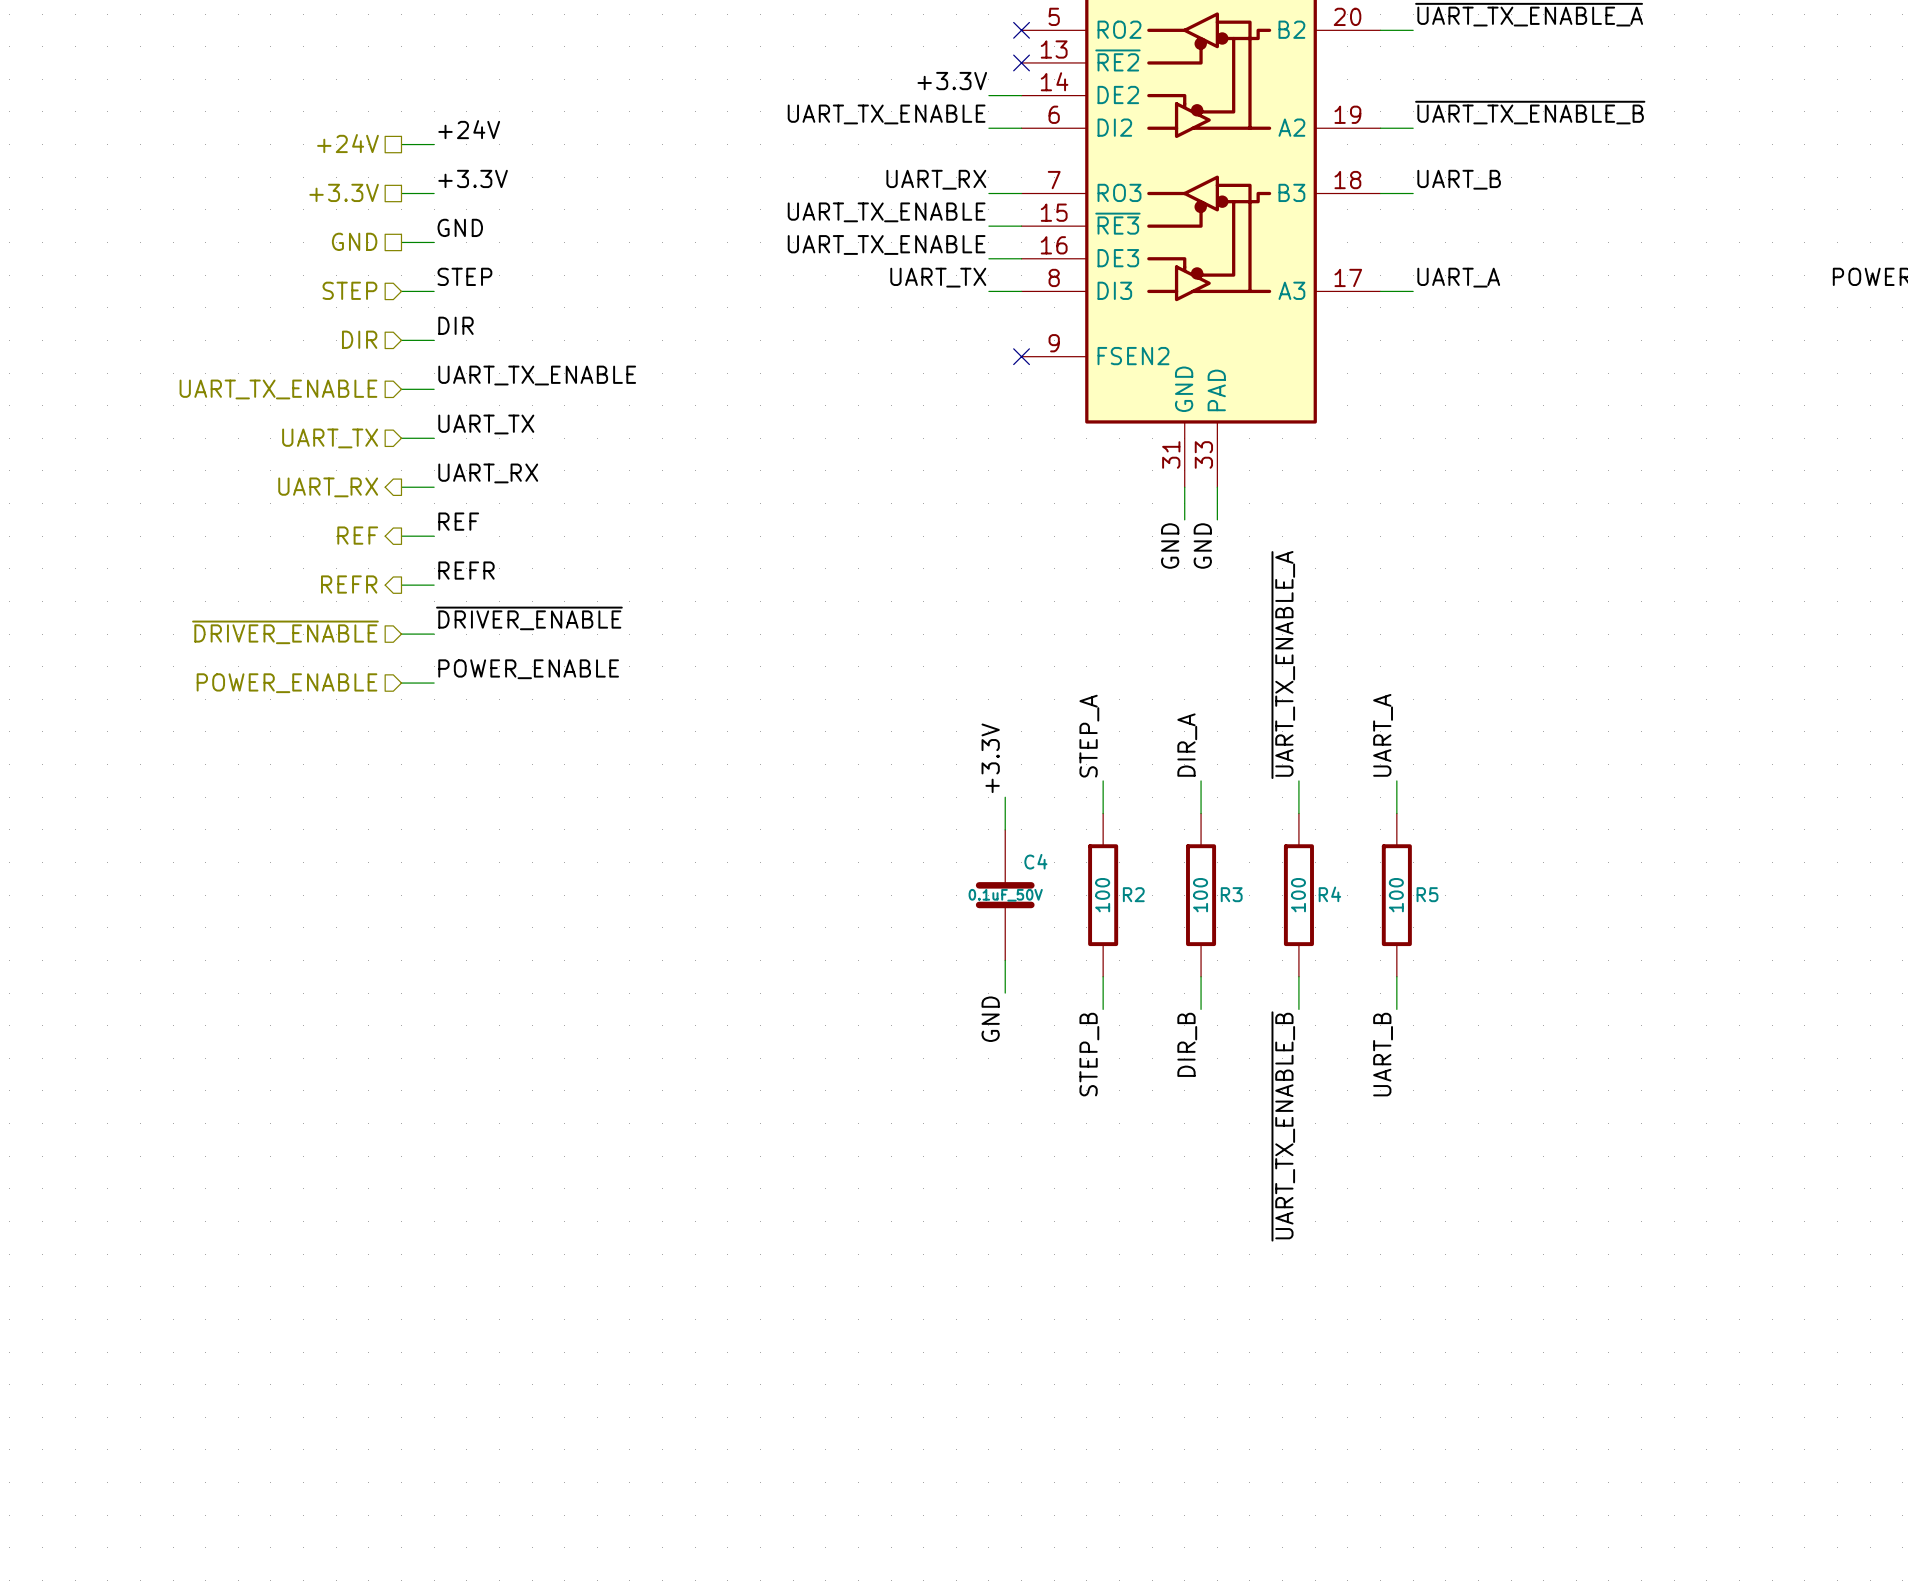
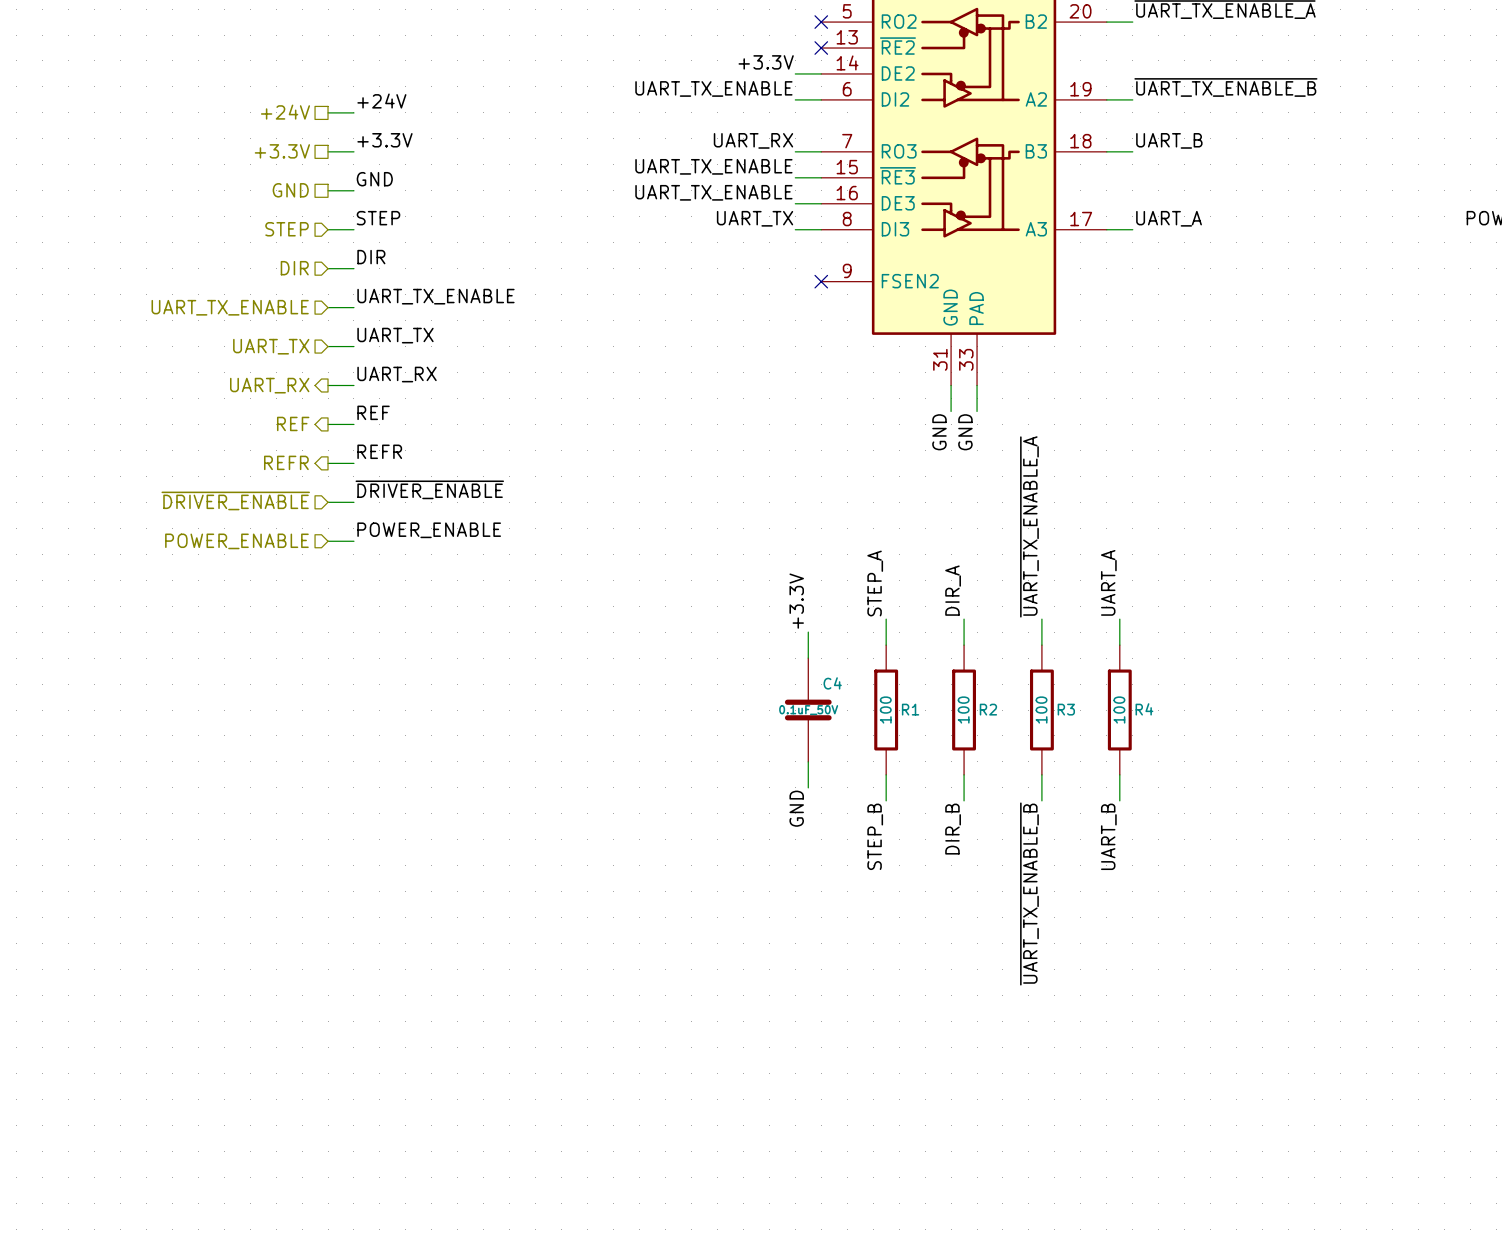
R2 name: R2 (1133, 894) -> R1 (910, 709)
R3 name: R3 (1231, 894) -> R2 (988, 709)
R4 name: R4 (1329, 894) -> R3 (1066, 709)
R5 name: R5 (1427, 894) -> R4 (1144, 709)

